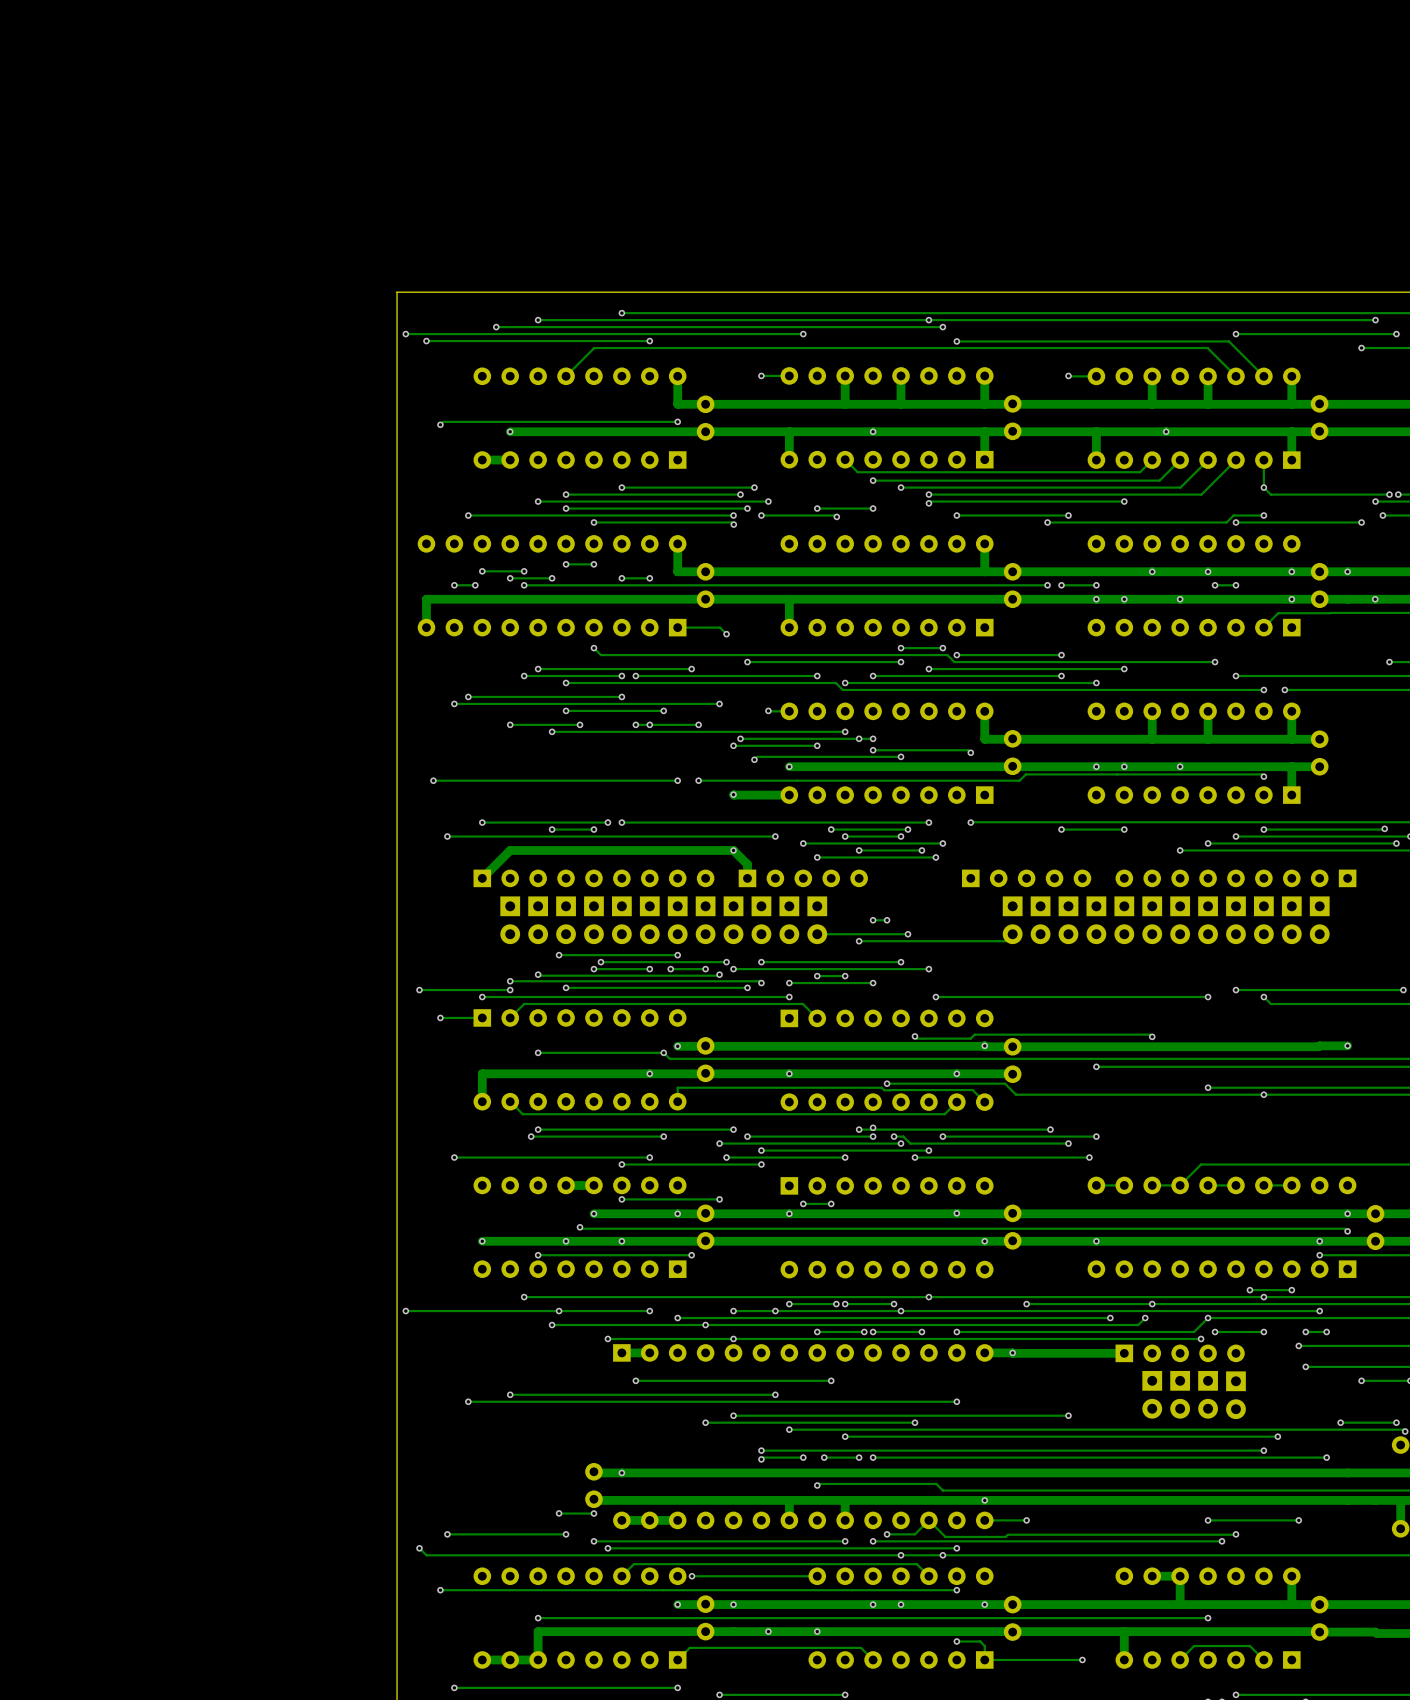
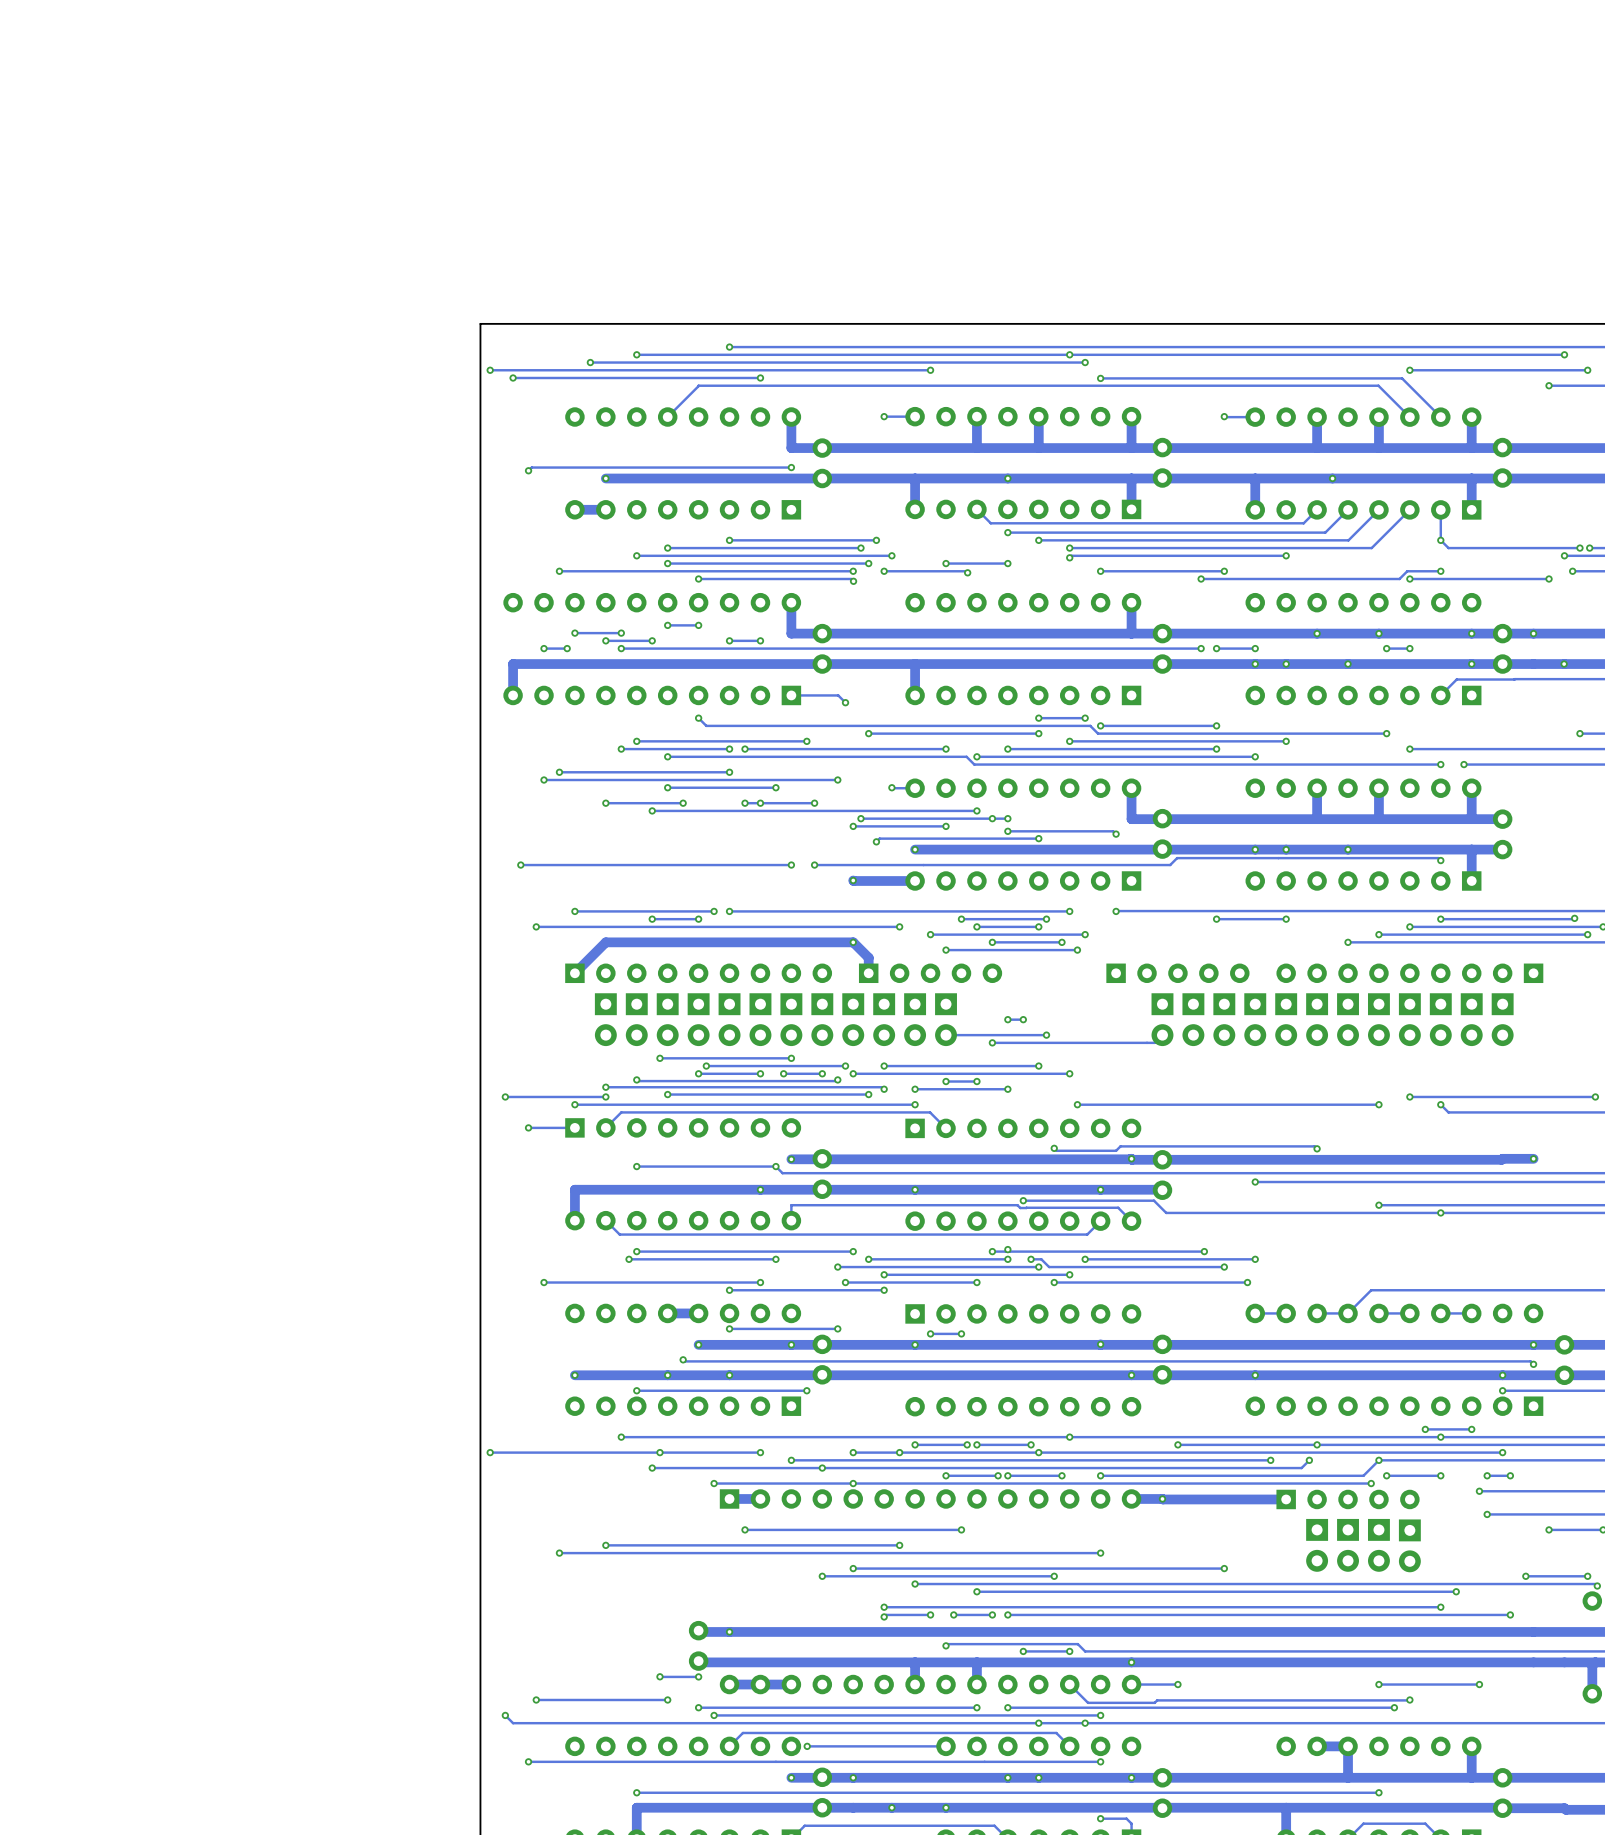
via: none -> (1023, 1651)
track: none -> (1069, 1651) (1023, 1651)
via: none -> (1069, 1651)
track: (928, 1520) (914, 1534) (887, 1534) -> none
via: (887, 1534) -> none

